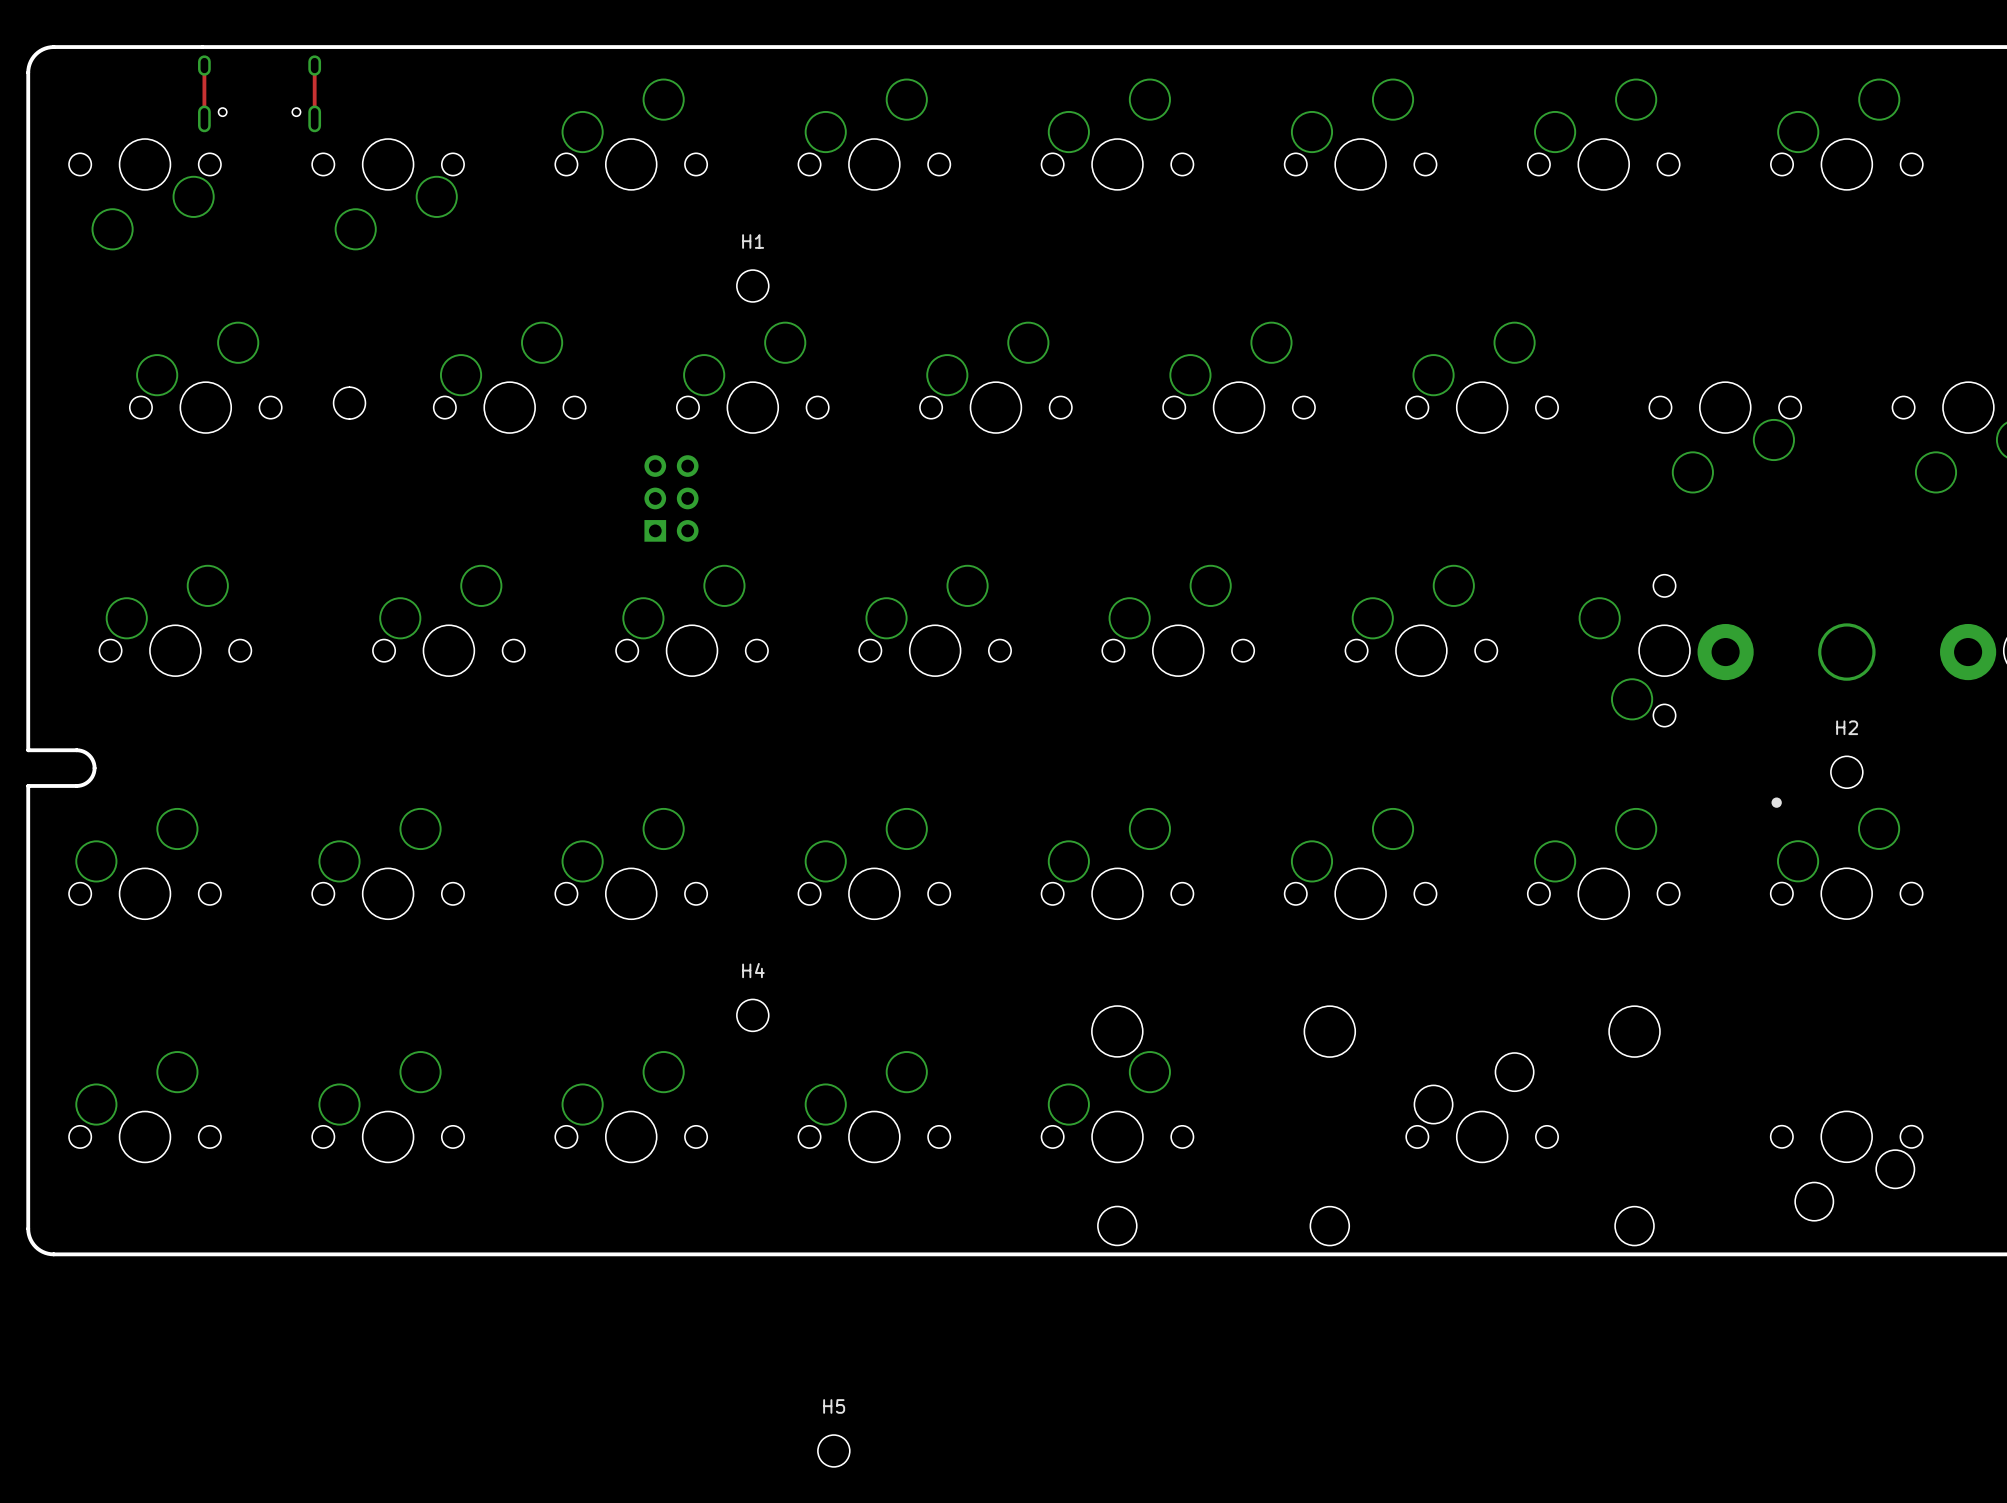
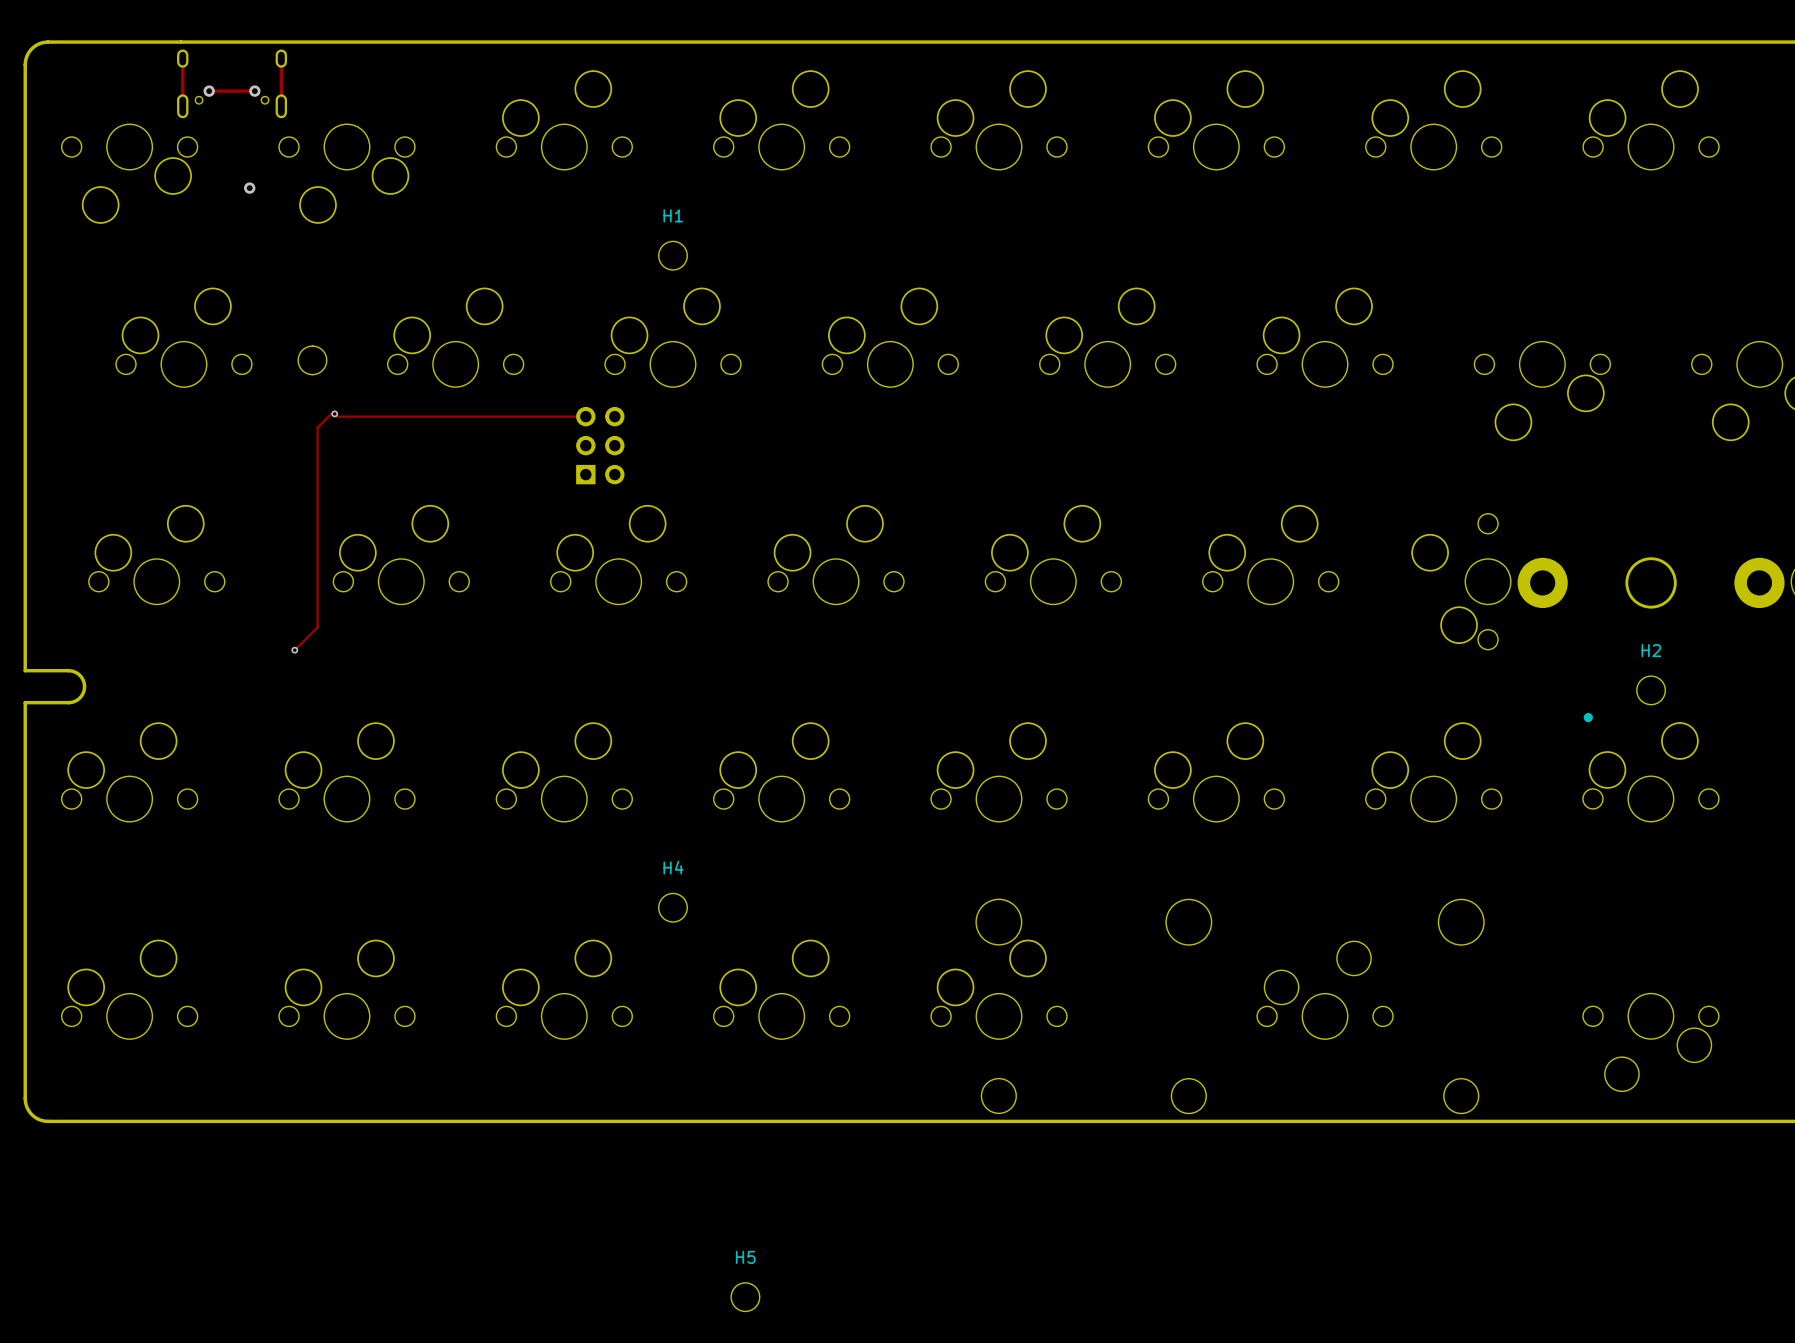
track: none -> (209, 91) (254, 91)
via: none -> (209, 91)
via: none -> (254, 91)
via: none -> (249, 188)
via: none -> (334, 413)
track: none -> (585, 416) (337, 416) (331, 413) (317, 427) (317, 627) (294, 650)
via: none -> (294, 650)

